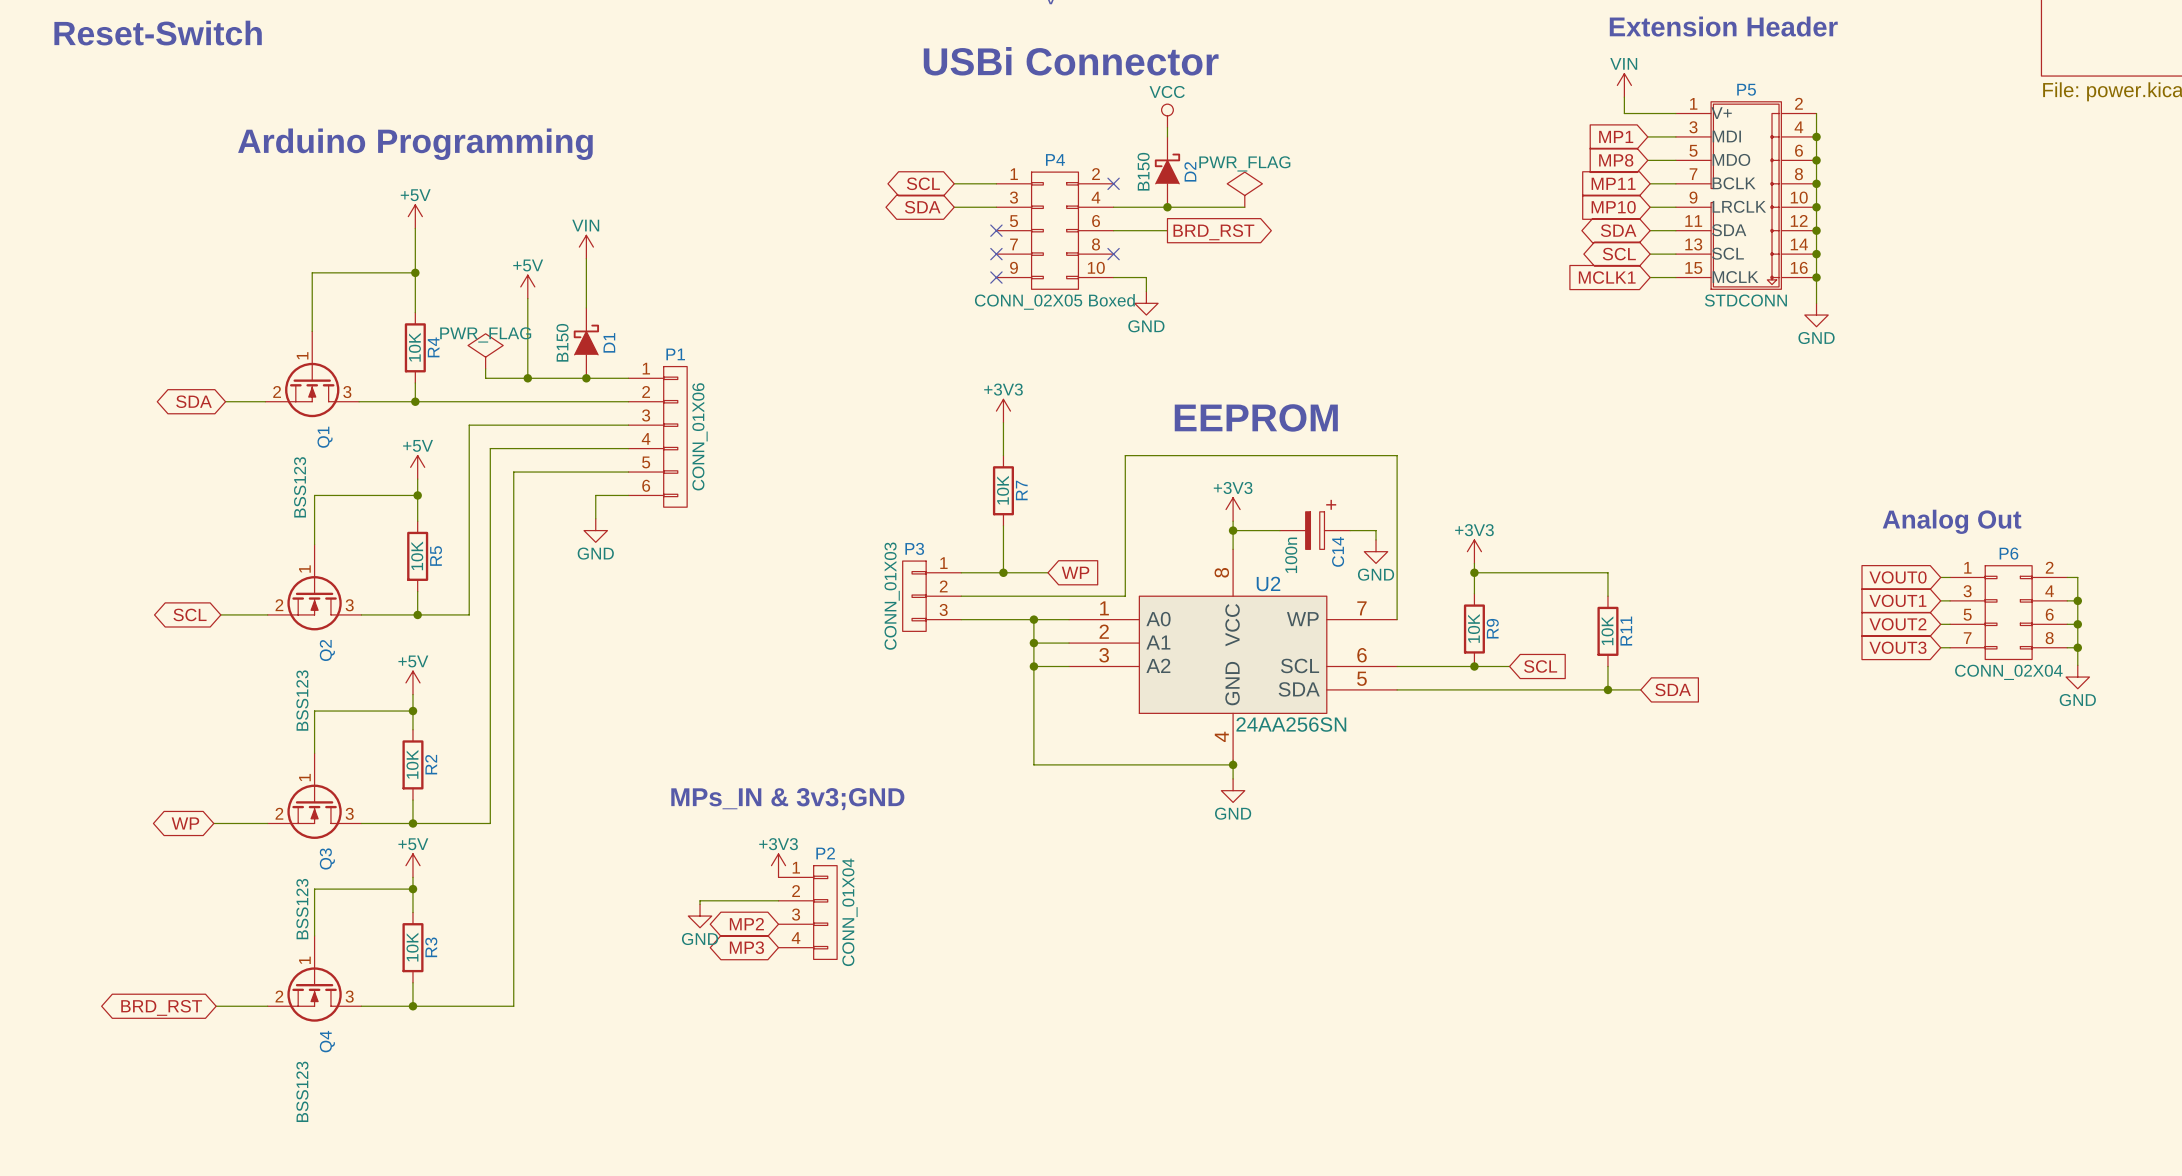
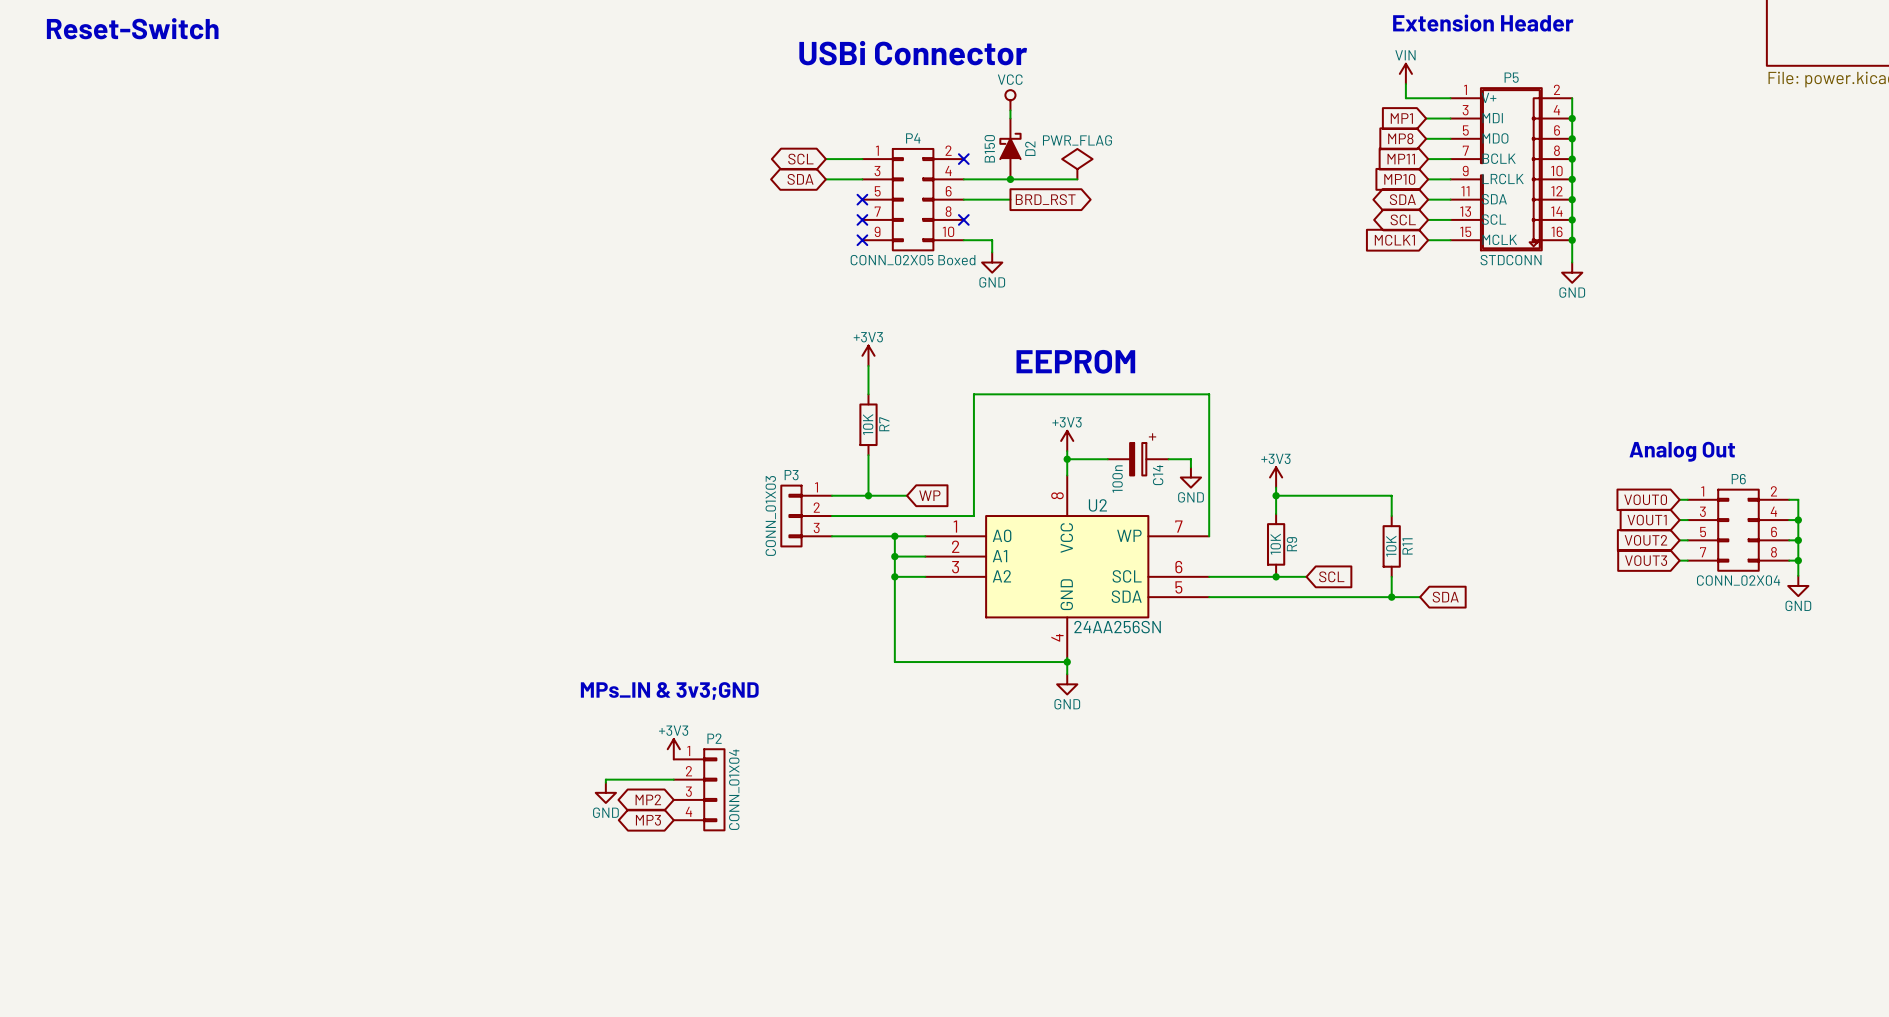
text: Arduino Programming (415, 144) -> none
power symbol: +5V (415, 216) -> none
wire: (415, 228) (415, 312) -> none
power symbol: VIN (586, 247) -> none
wire: (586, 258) (586, 308) -> none
wire: (415, 272) (312, 272) (312, 331) -> none
junction: (415, 272) -> none
power symbol: +5V (527, 286) -> none
wire: (527, 298) (527, 378) -> none
D1: B150 (586, 343) -> none
R4: 10K (415, 347) -> none
power symbol: PWR_FLAG (485, 351) -> none
wire: (485, 368) (485, 378) (628, 378) -> none
Q1: BSS123 (312, 374) -> none
junction: (527, 378) -> none
junction: (586, 378) -> none
wire: (415, 382) (415, 401) -> none
global label: SDA (194, 401) -> none
wire: (225, 401) (265, 401) -> none
wire: (359, 401) (628, 401) -> none
junction: (415, 401) -> none
wire: (628, 425) (469, 425) (469, 614) (361, 614) -> none
P1: CONN_01X06 (657, 436) -> none
wire: (628, 448) (490, 448) (490, 823) (361, 823) -> none
power symbol: +5V (417, 467) -> none
wire: (628, 472) (513, 472) (513, 1006) (361, 1006) -> none
wire: (417, 479) (417, 521) -> none
wire: (417, 495) (314, 495) (314, 544) -> none
junction: (417, 495) -> none
wire: (628, 495) (595, 495) (595, 518) -> none
power symbol: GND (595, 530) -> none
R5: 10K (417, 556) -> none
Q2: BSS123 (314, 587) -> none
wire: (417, 591) (417, 614) -> none
global label: SCL (190, 614) -> none
wire: (220, 614) (267, 614) -> none
junction: (417, 614) -> none
power symbol: +5V (412, 682) -> none
wire: (412, 694) (412, 729) -> none
wire: (412, 711) (314, 711) (314, 753) -> none
junction: (412, 711) -> none
R2: 10K (412, 764) -> none
Q3: BSS123 (314, 796) -> none
wire: (412, 800) (412, 823) -> none
global label: WP (185, 823) -> none
wire: (213, 823) (267, 823) -> none
junction: (412, 823) -> none
power symbol: +5V (412, 865) -> none
wire: (412, 877) (412, 912) -> none
wire: (412, 889) (314, 889) (314, 935) -> none
junction: (412, 889) -> none
R3: 10K (412, 947) -> none
Q4: BSS123 (314, 978) -> none
wire: (412, 982) (412, 1006) -> none
wire: (216, 1006) (267, 1006) -> none
junction: (412, 1006) -> none
global label: BRD_RST (161, 1007) -> none

